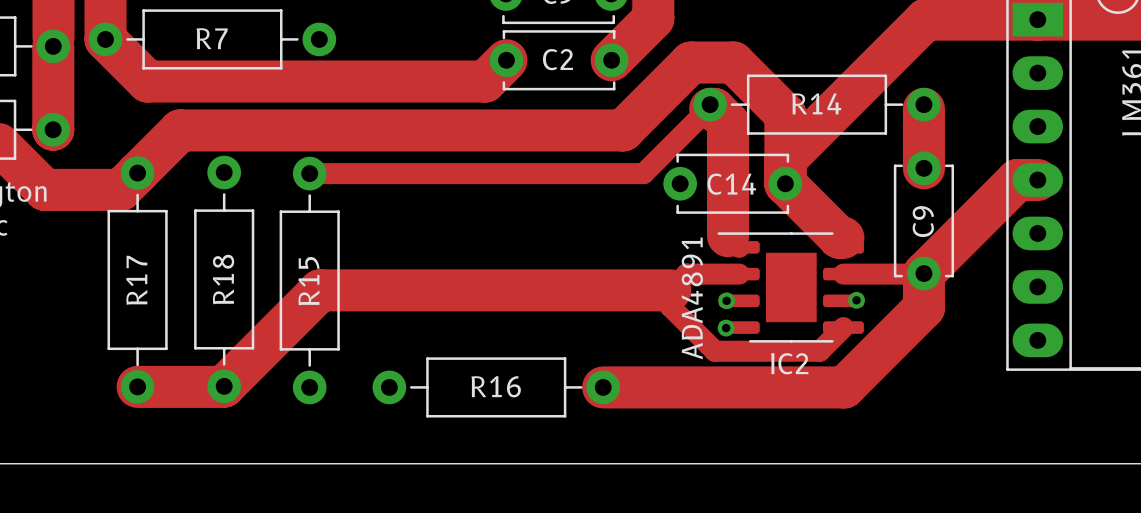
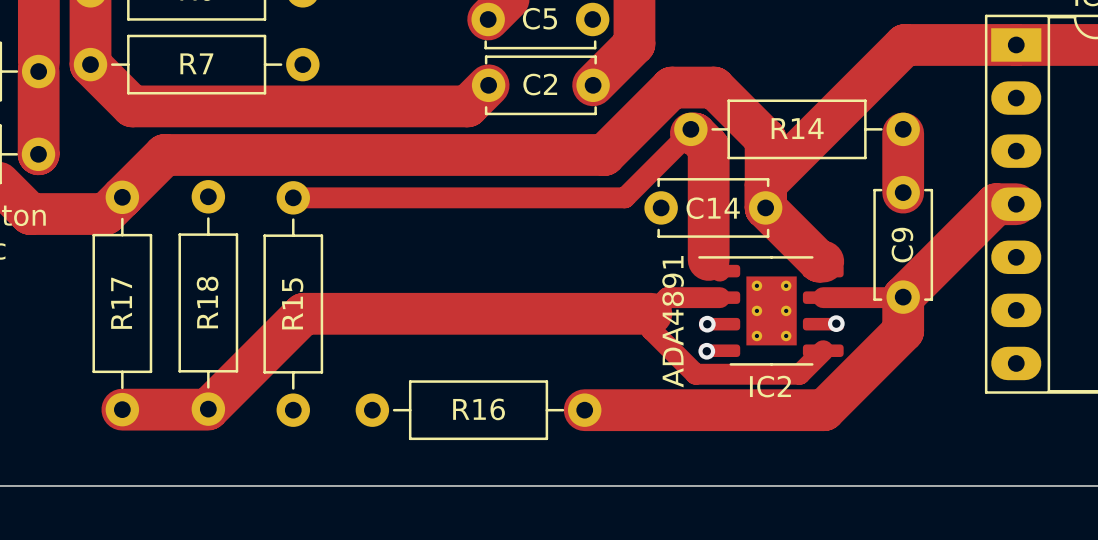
IC2 footprint: [717, 232, 864, 343] -> [698, 256, 844, 366]

